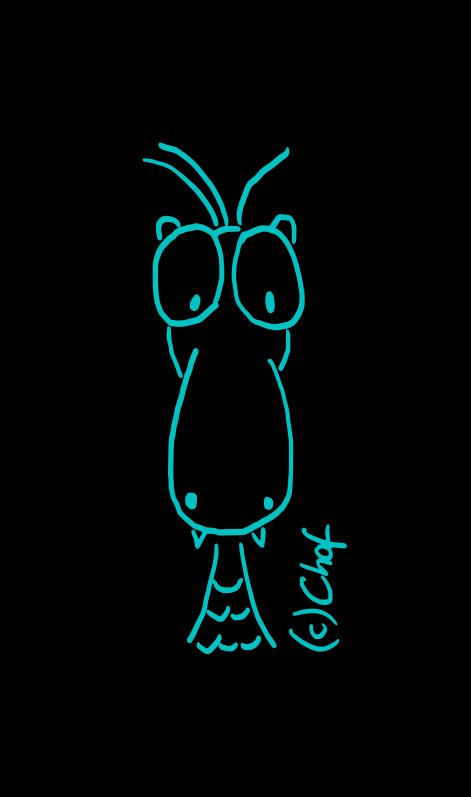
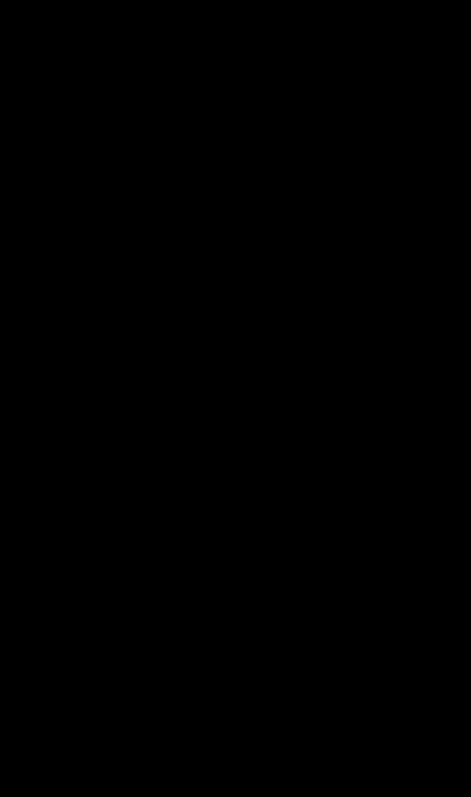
drawing: [142, 142, 347, 655] -> none

